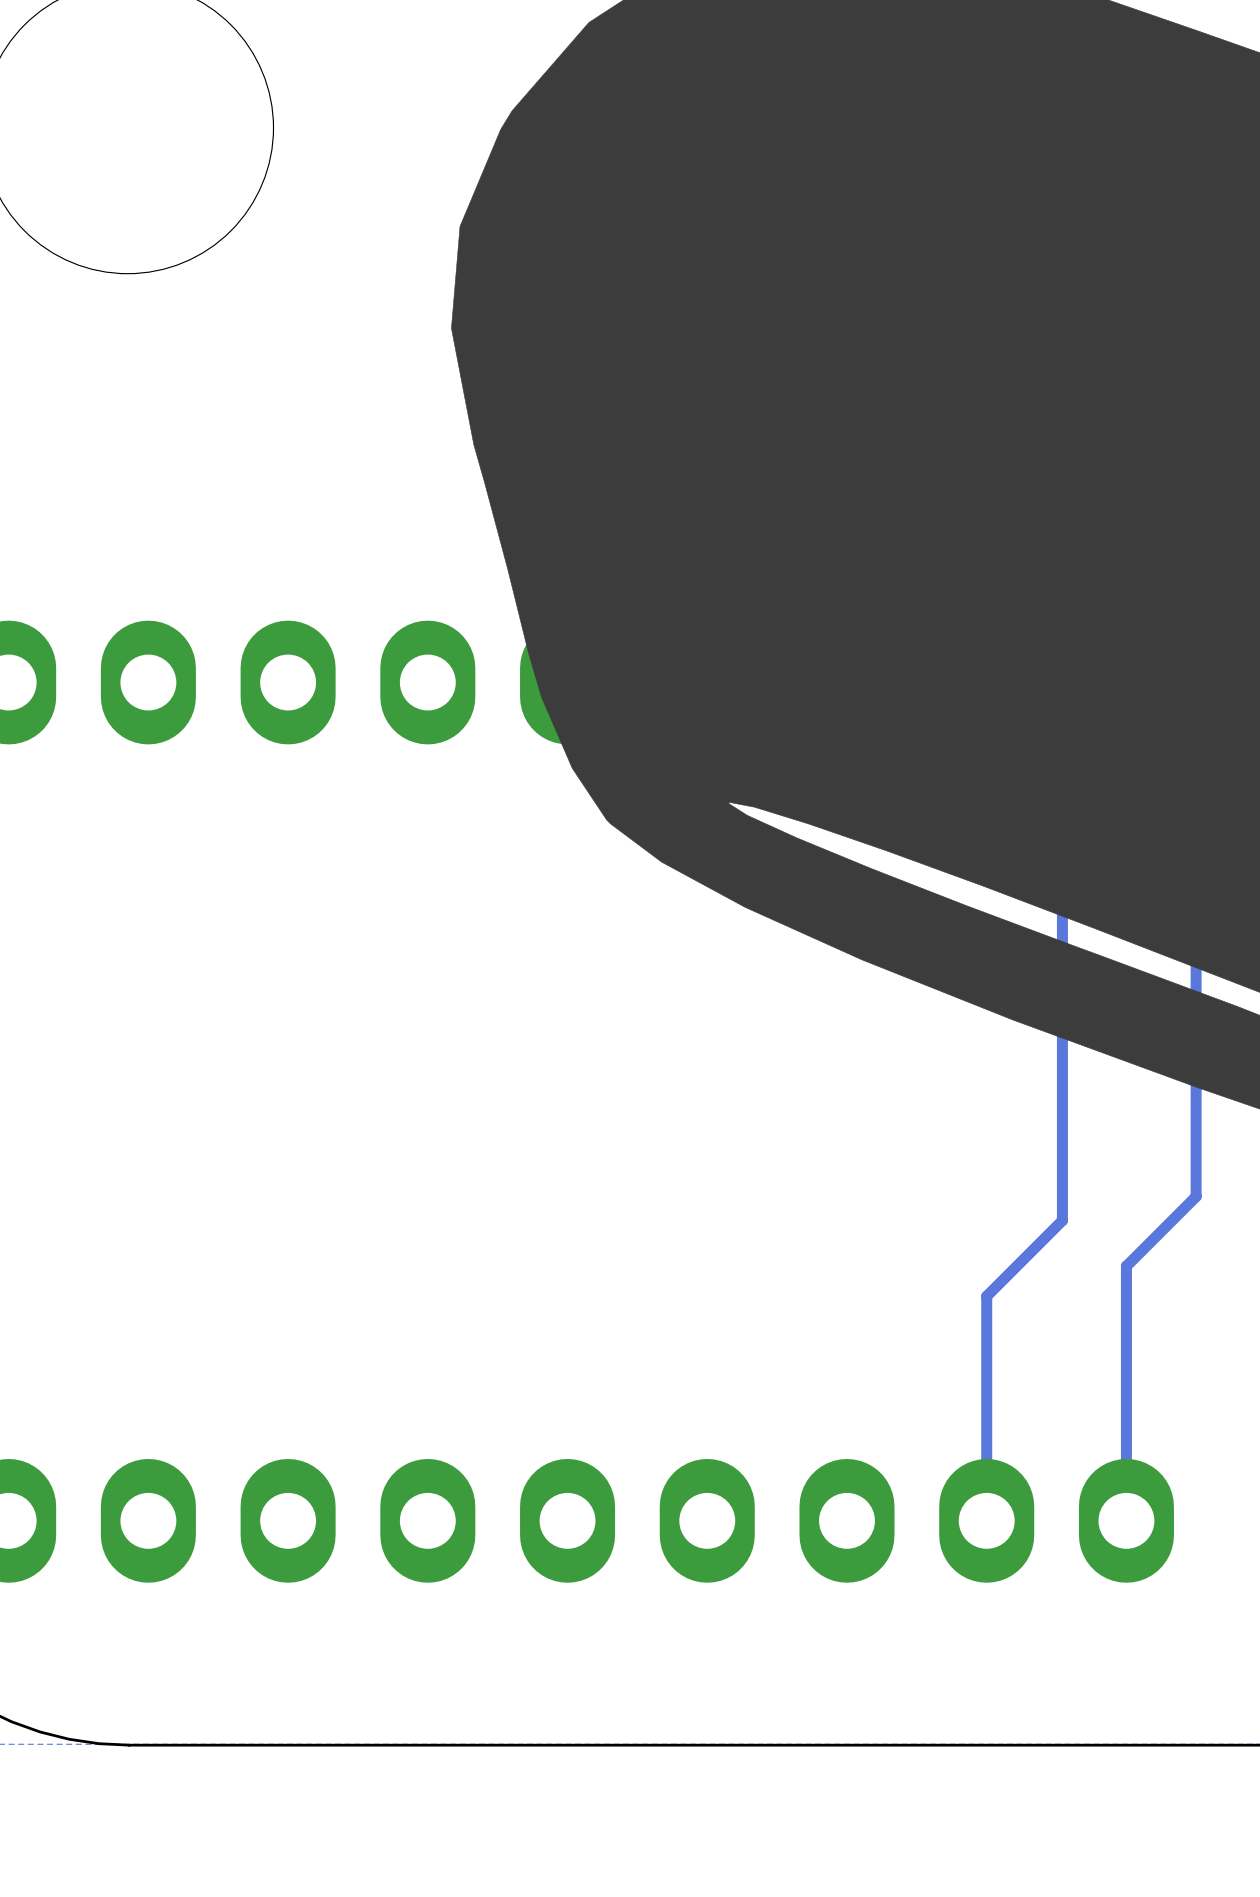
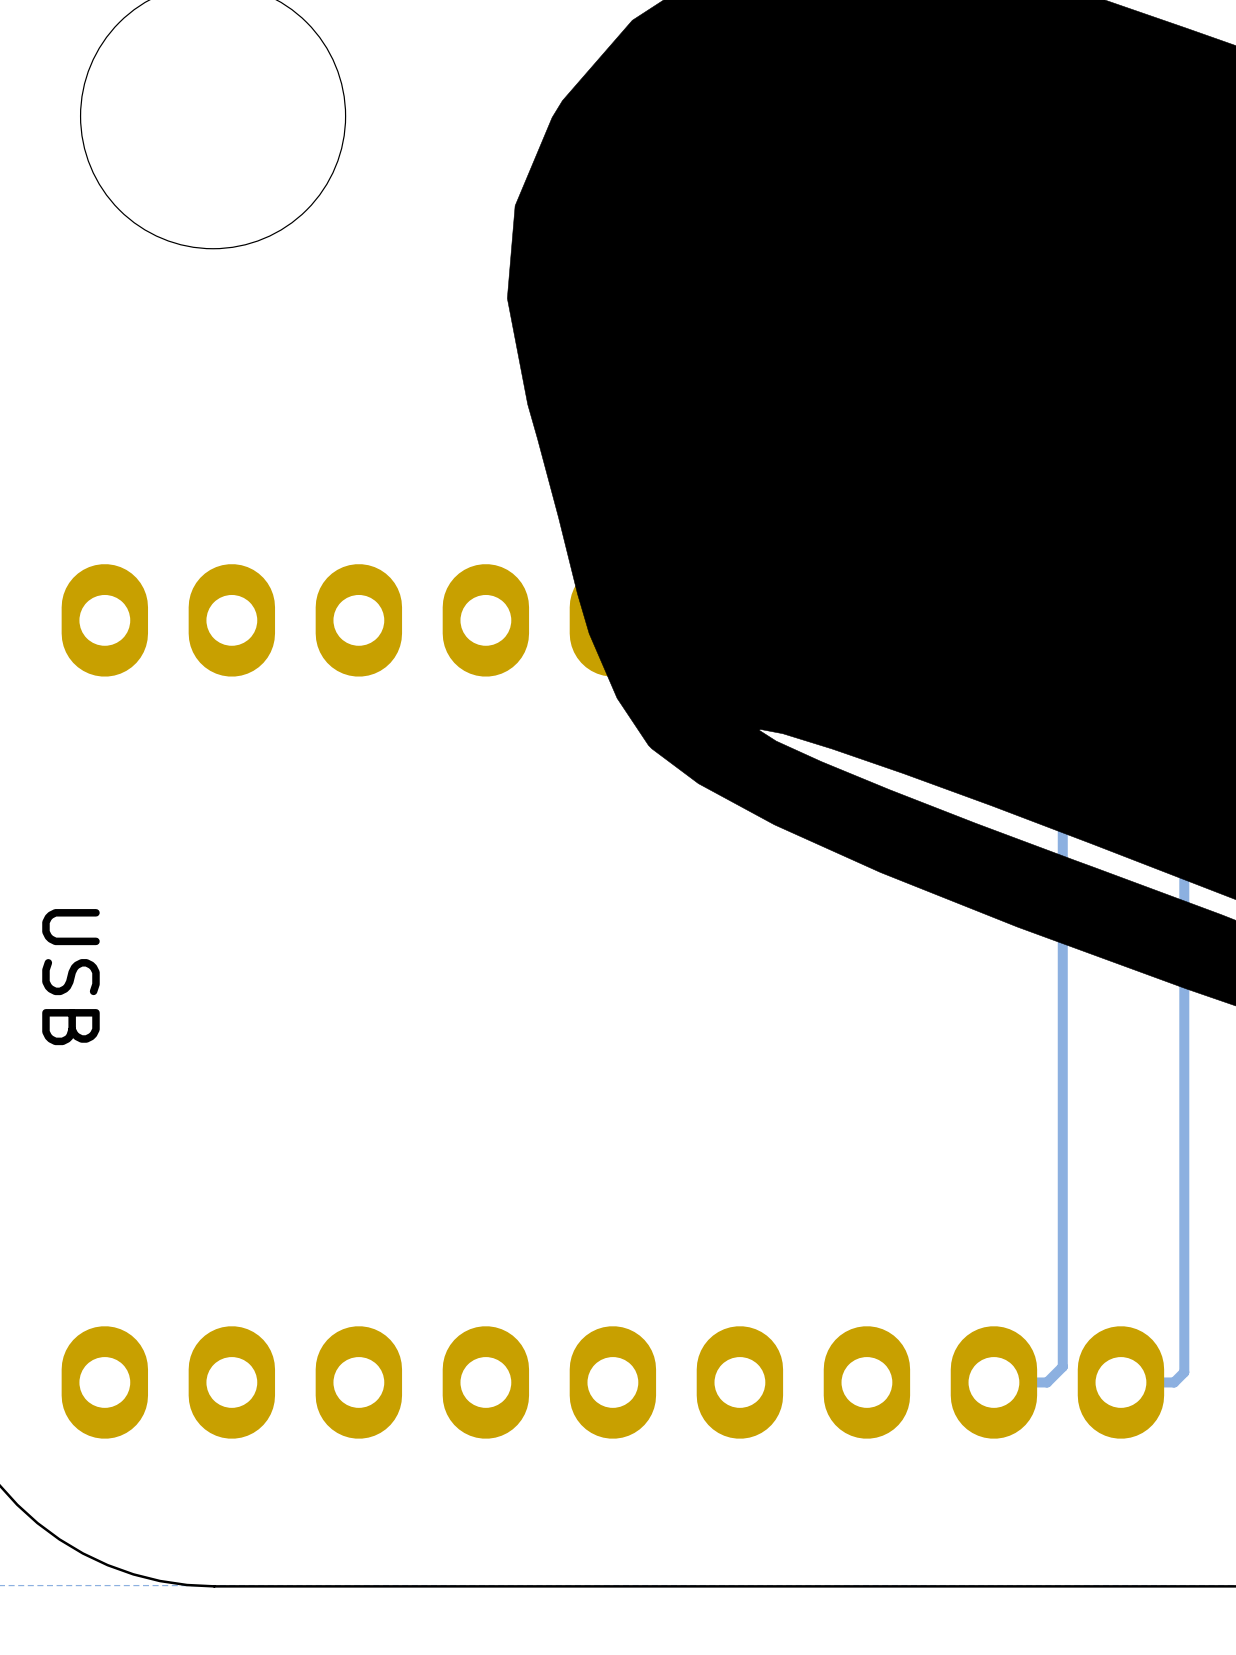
track: (1196, 1196) (1126, 1266) (1126, 1520) -> (1184, 1087) (1184, 1372) (1174, 1382) (1120, 1382)
track: (1062, 1220) (986, 1296) (986, 1520) -> (1062, 1109) (1062, 1366) (1047, 1382) (993, 1382)

